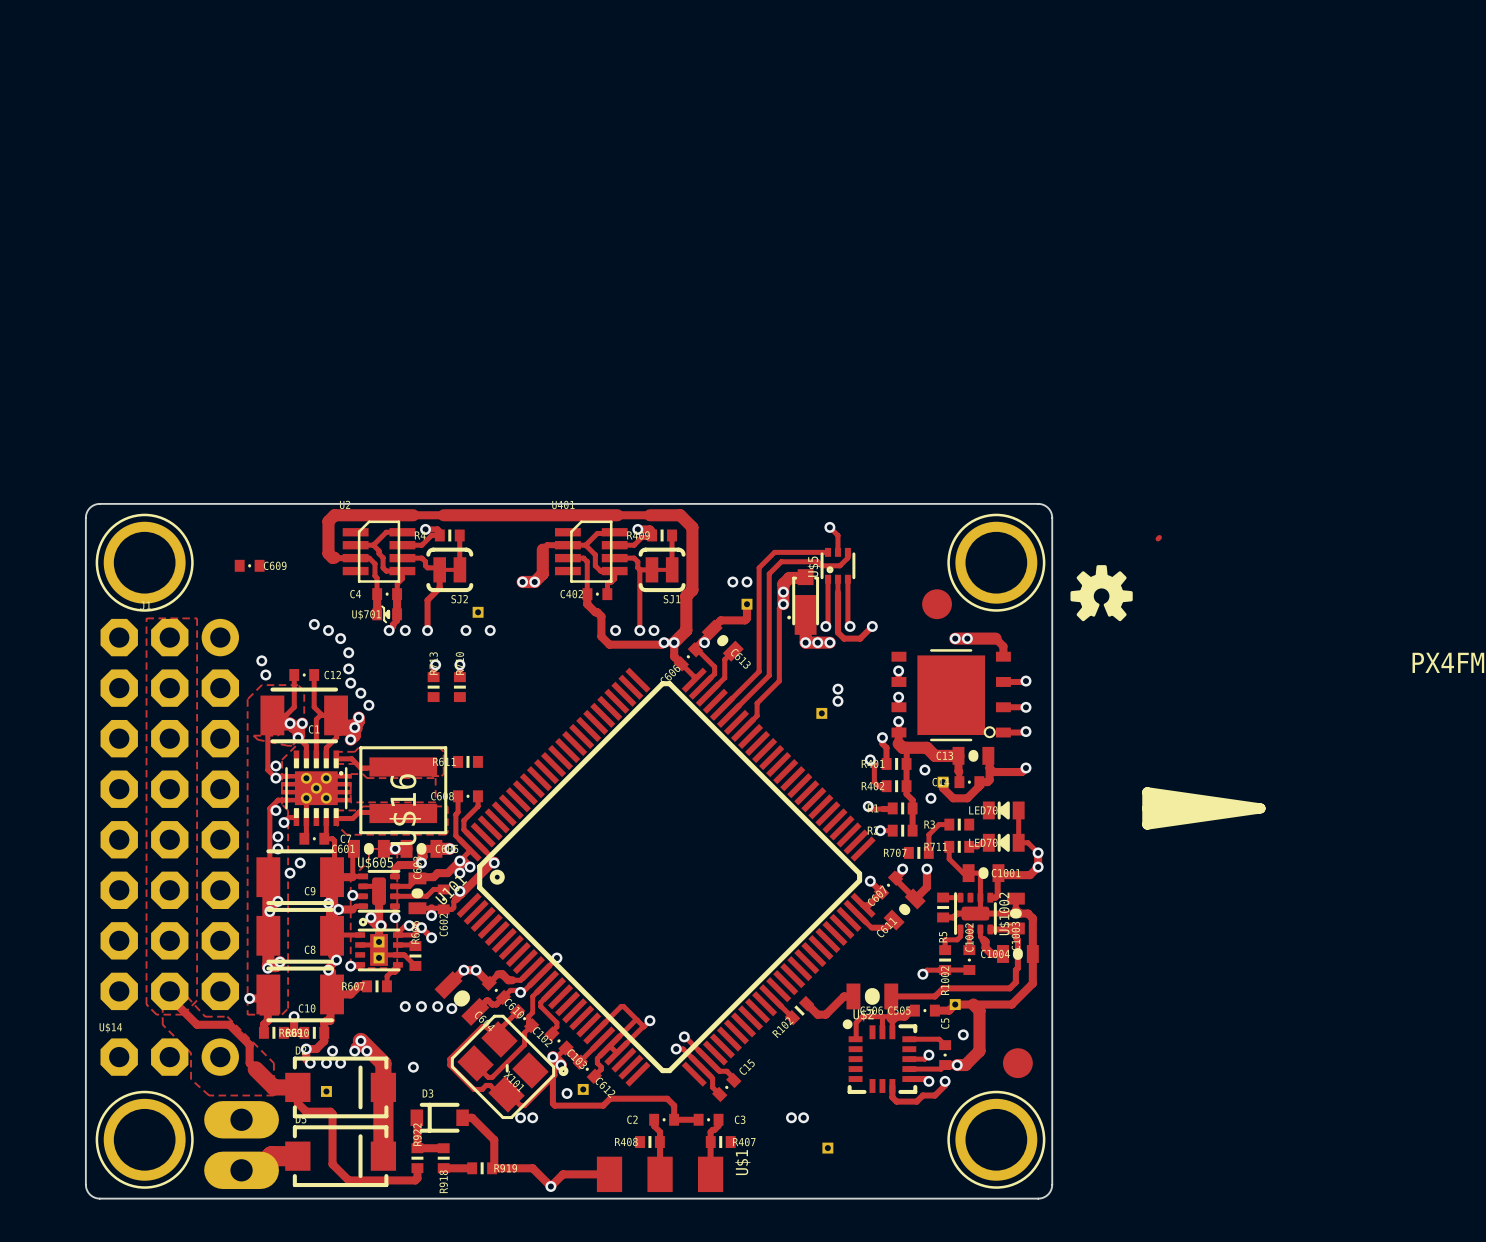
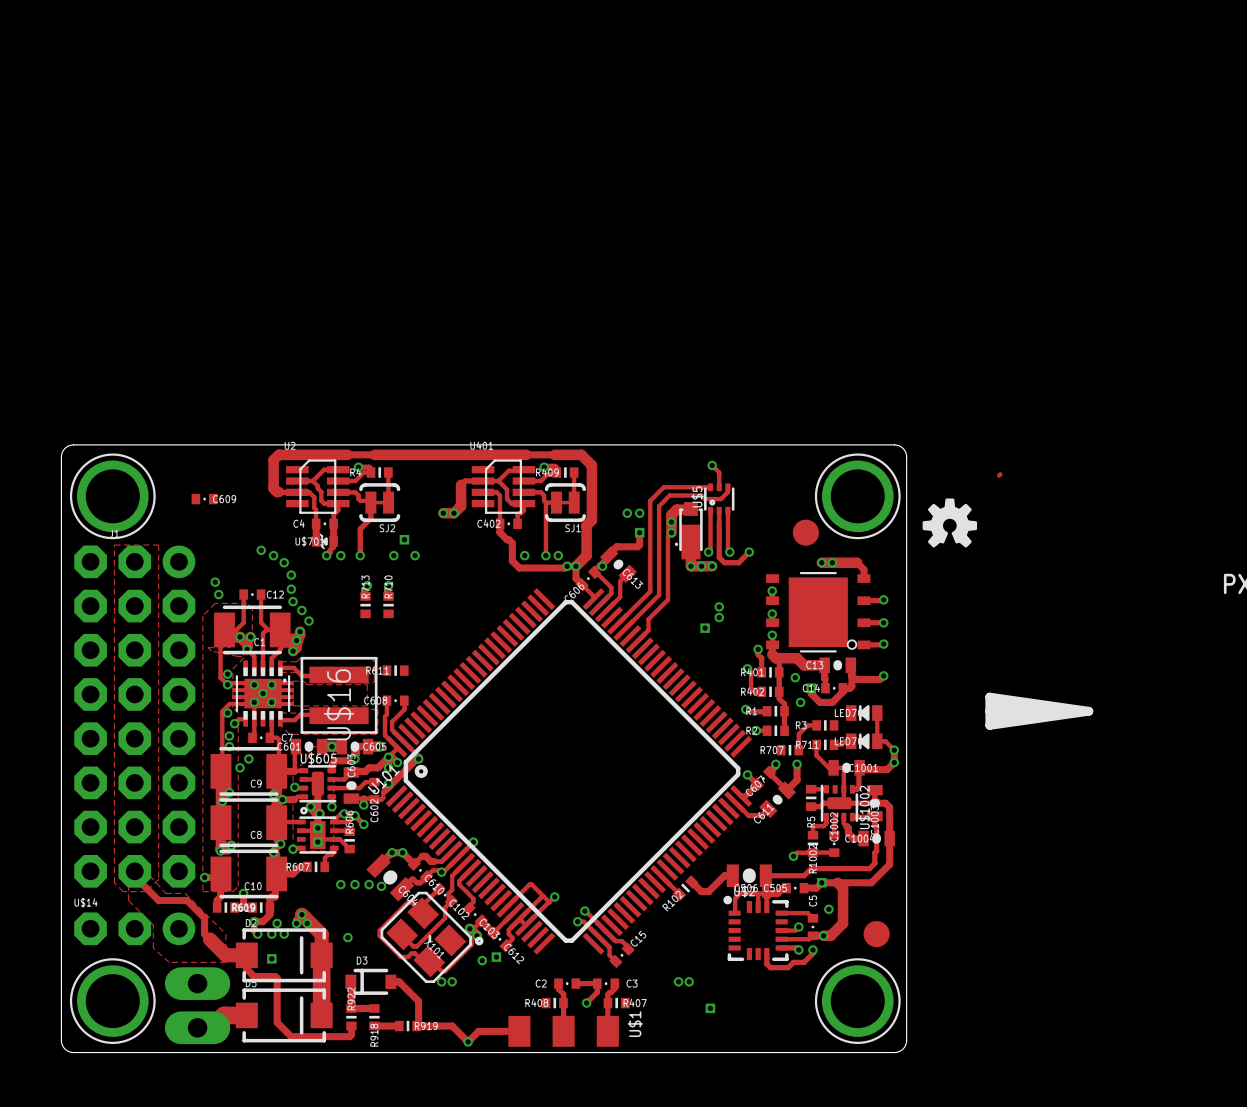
track: (552, 1077) (552, 1103) (554, 1105) (603, 1105) (610, 1098) (667, 1098) (674, 1105) (674, 1119) -> none
track: none -> (597, 983) (597, 992) (586, 1003)
via: none -> (586, 1003)

